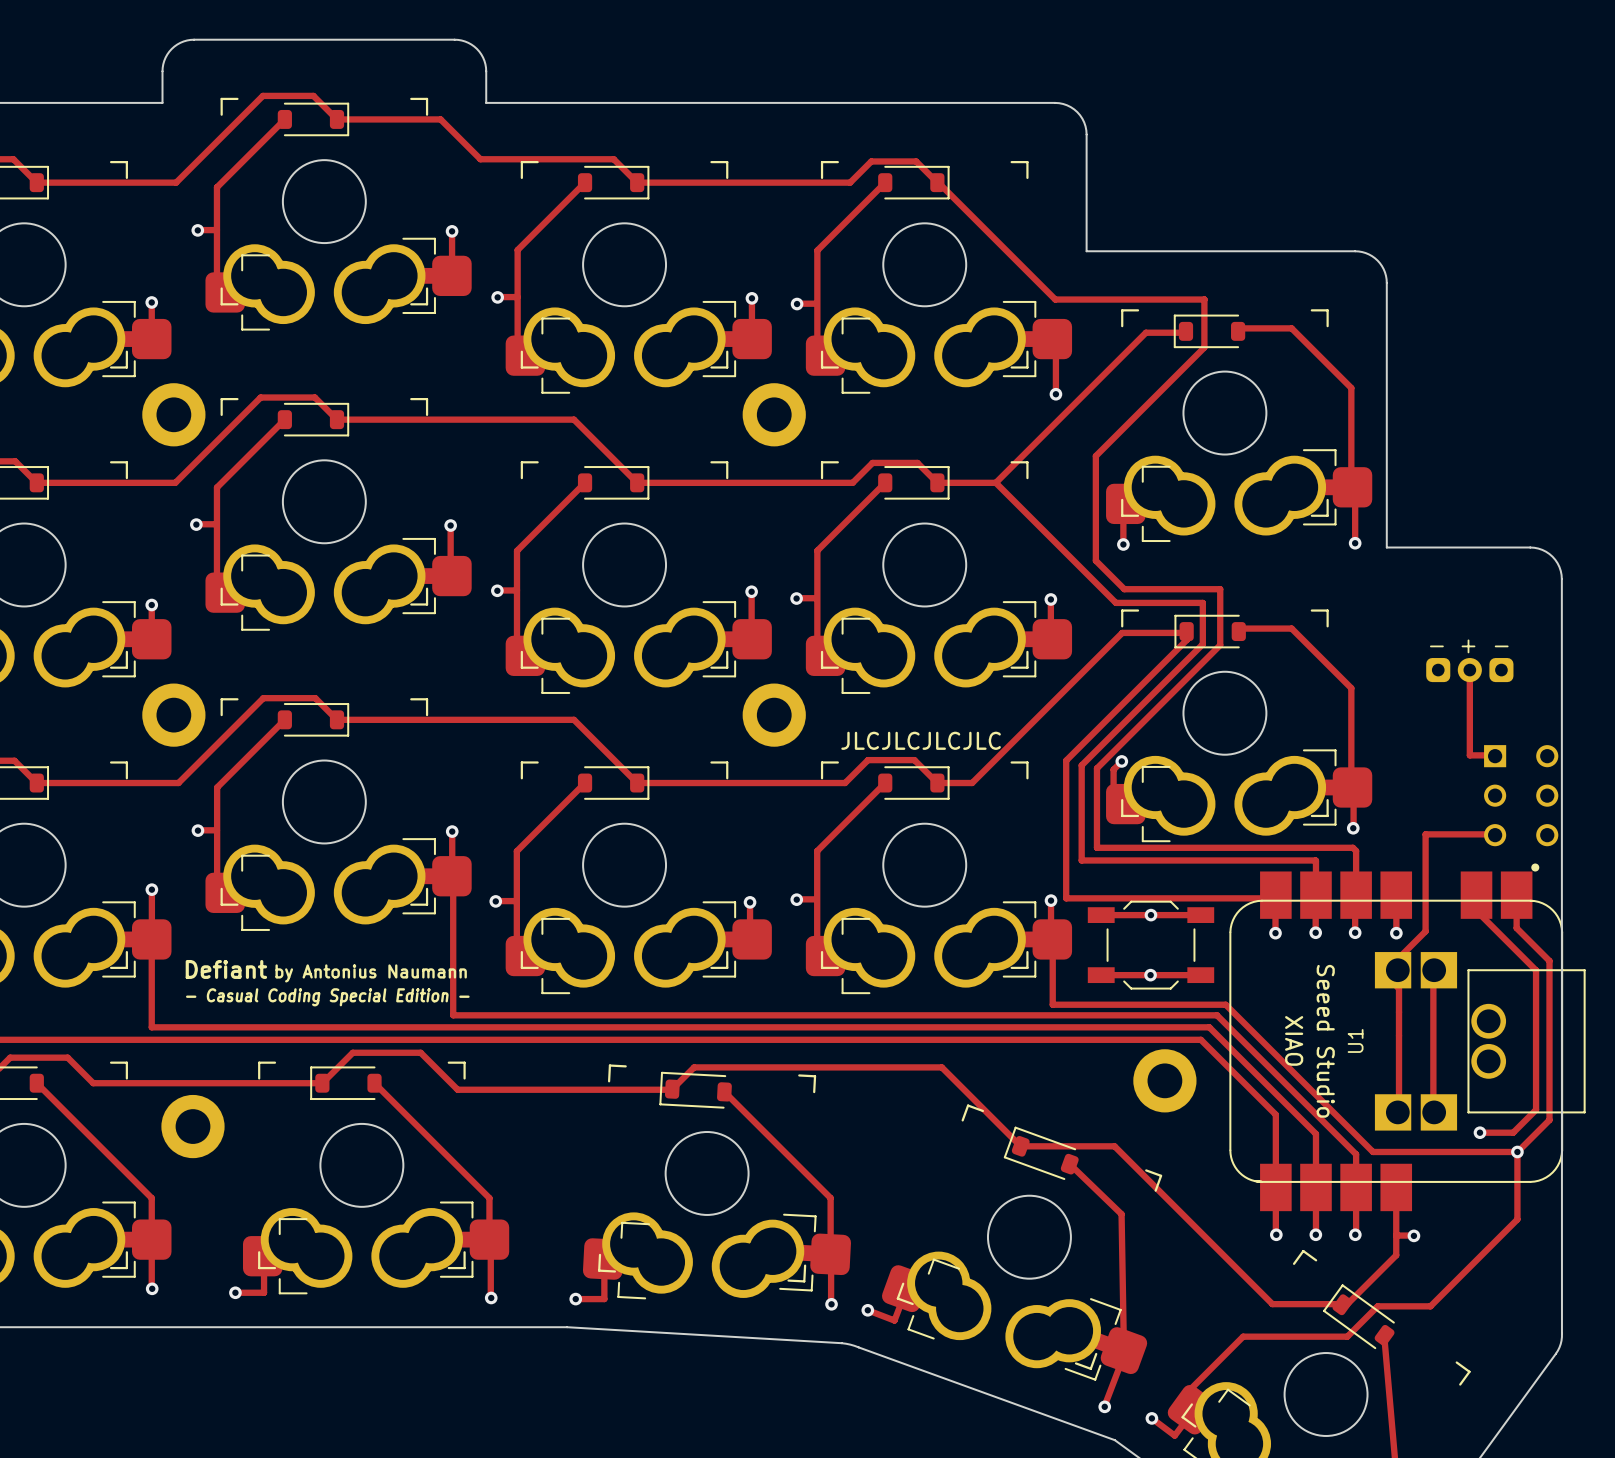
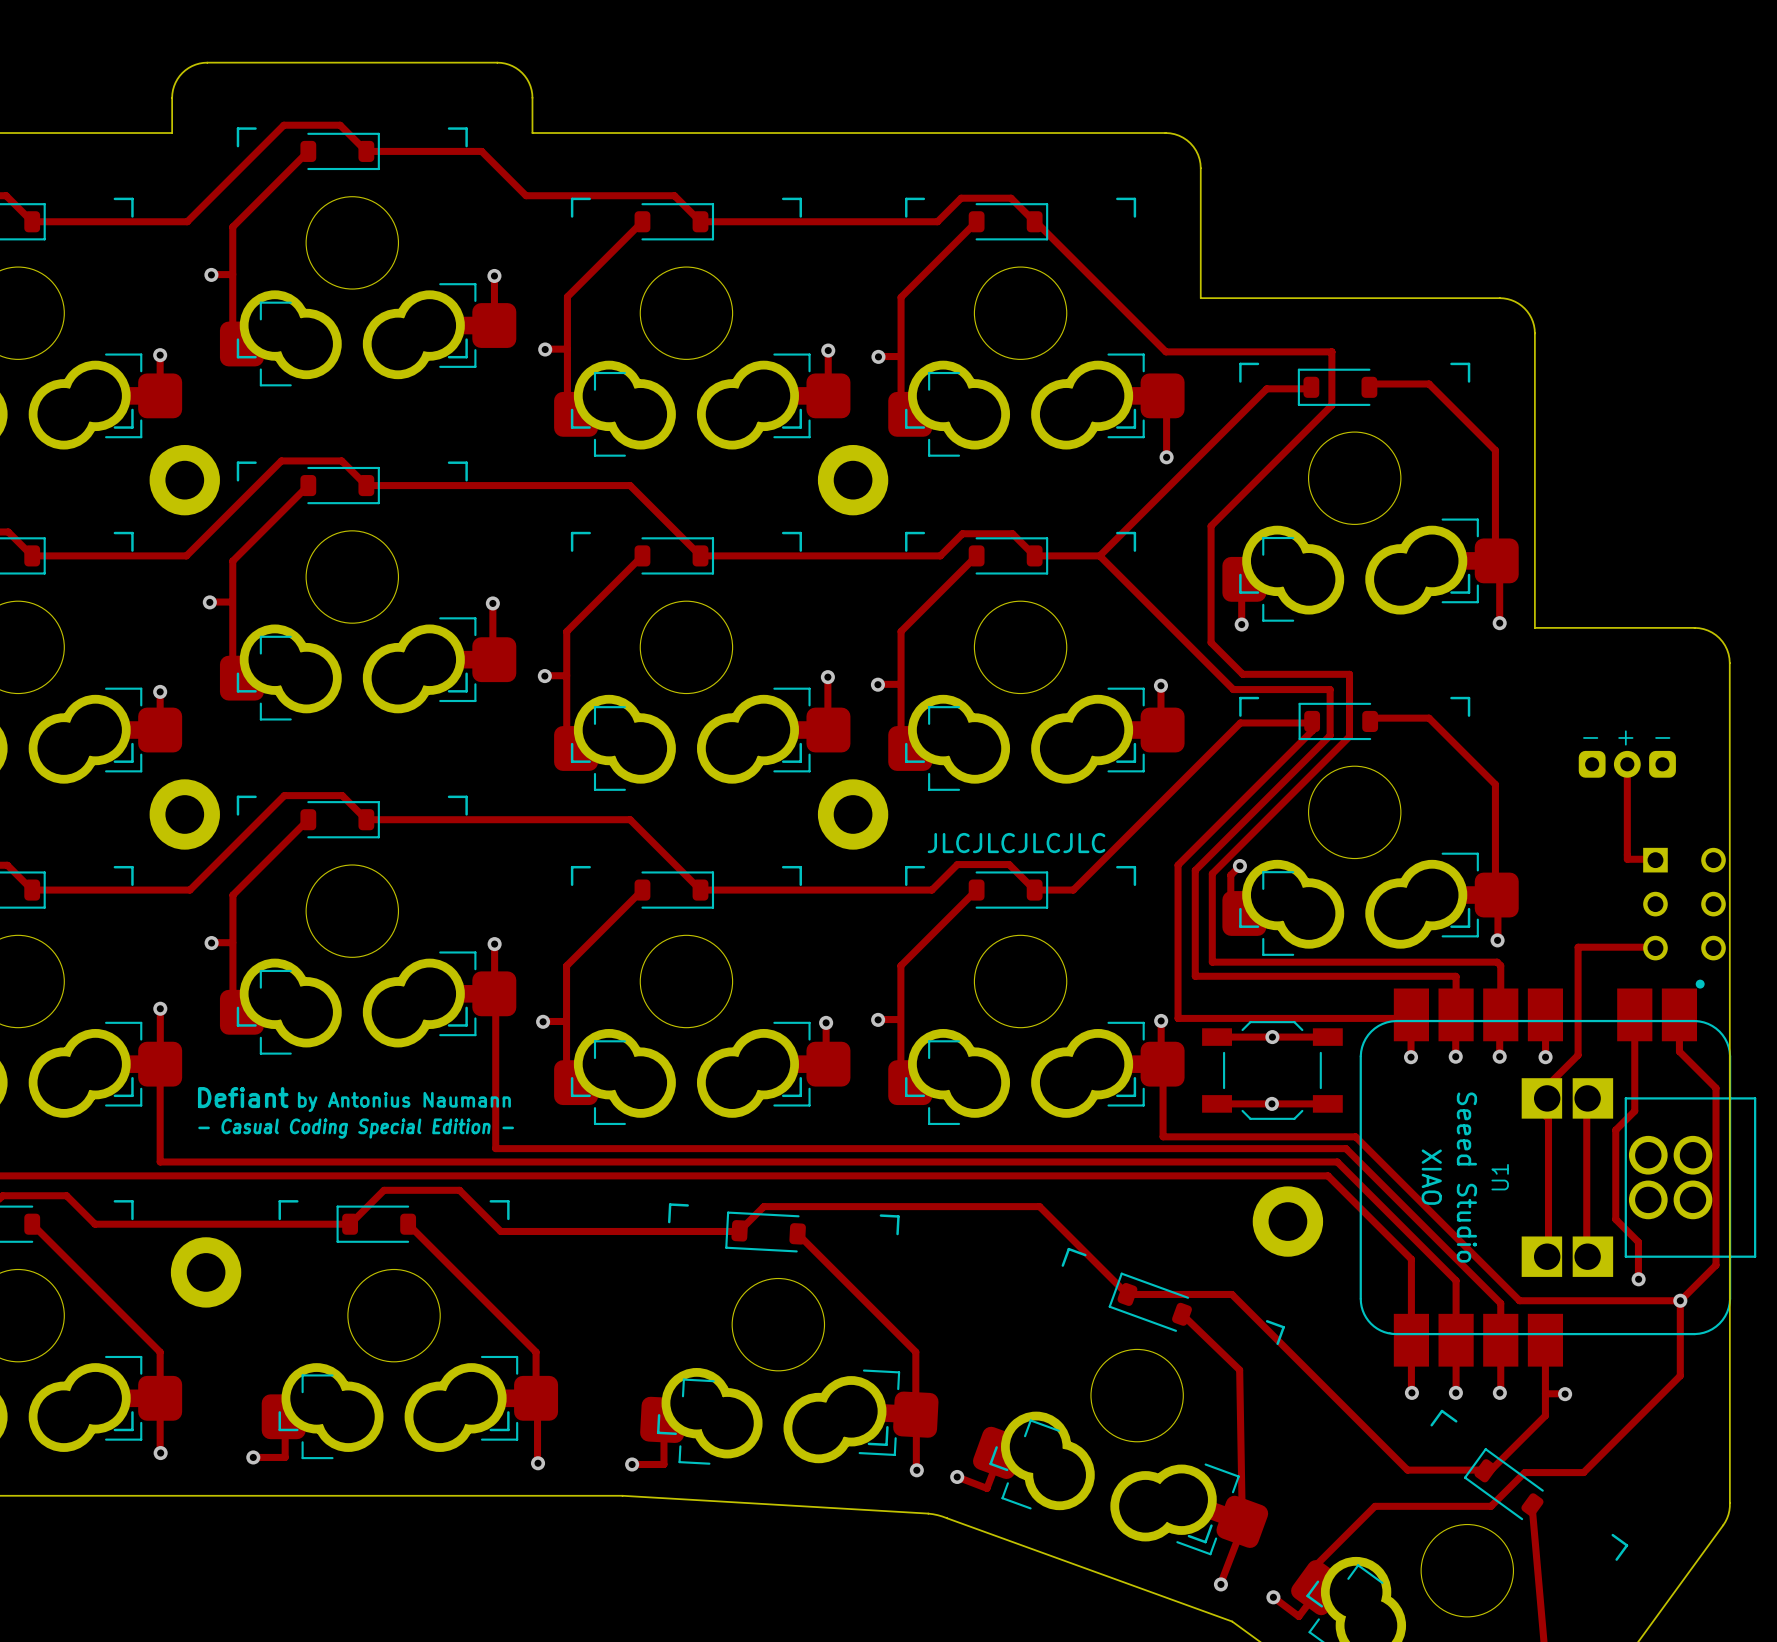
U1 footprint: [1229, 863, 1586, 1212] -> [1359, 979, 1757, 1367]
track: (1476, 910) (1536, 970) (1536, 1109) (1513, 1132) (1479, 1132) -> (1634, 1032) (1634, 1111) (1615, 1130) (1615, 1219) (1638, 1242) (1638, 1279)

